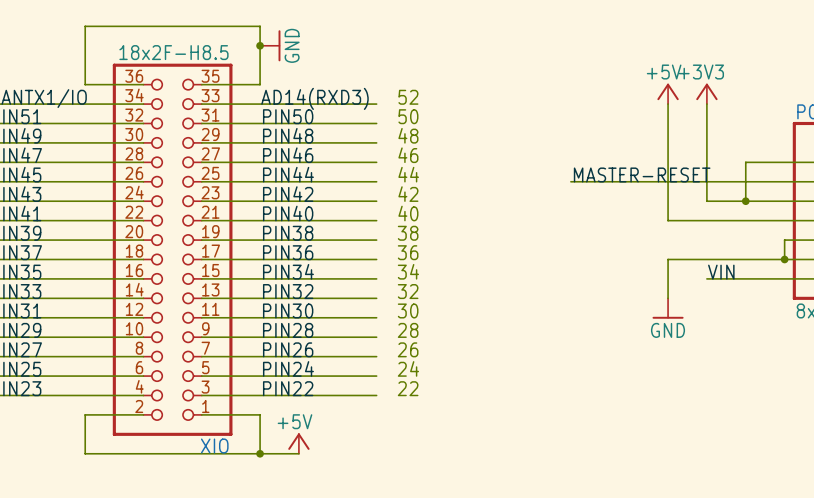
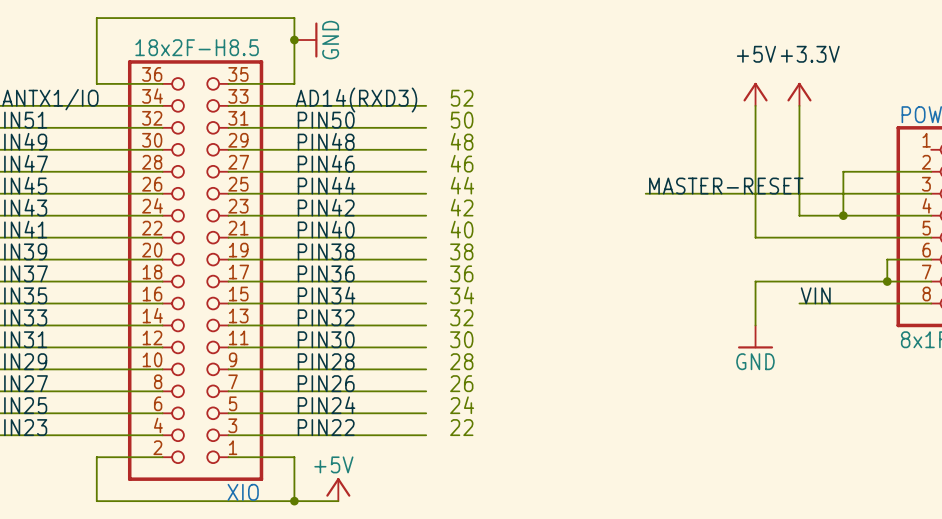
label: none -> +5V (756, 54)
label: none -> +3.3V (810, 54)
power symbol text: +5V (664, 72) -> none
power symbol text: +3V3 (701, 72) -> none

